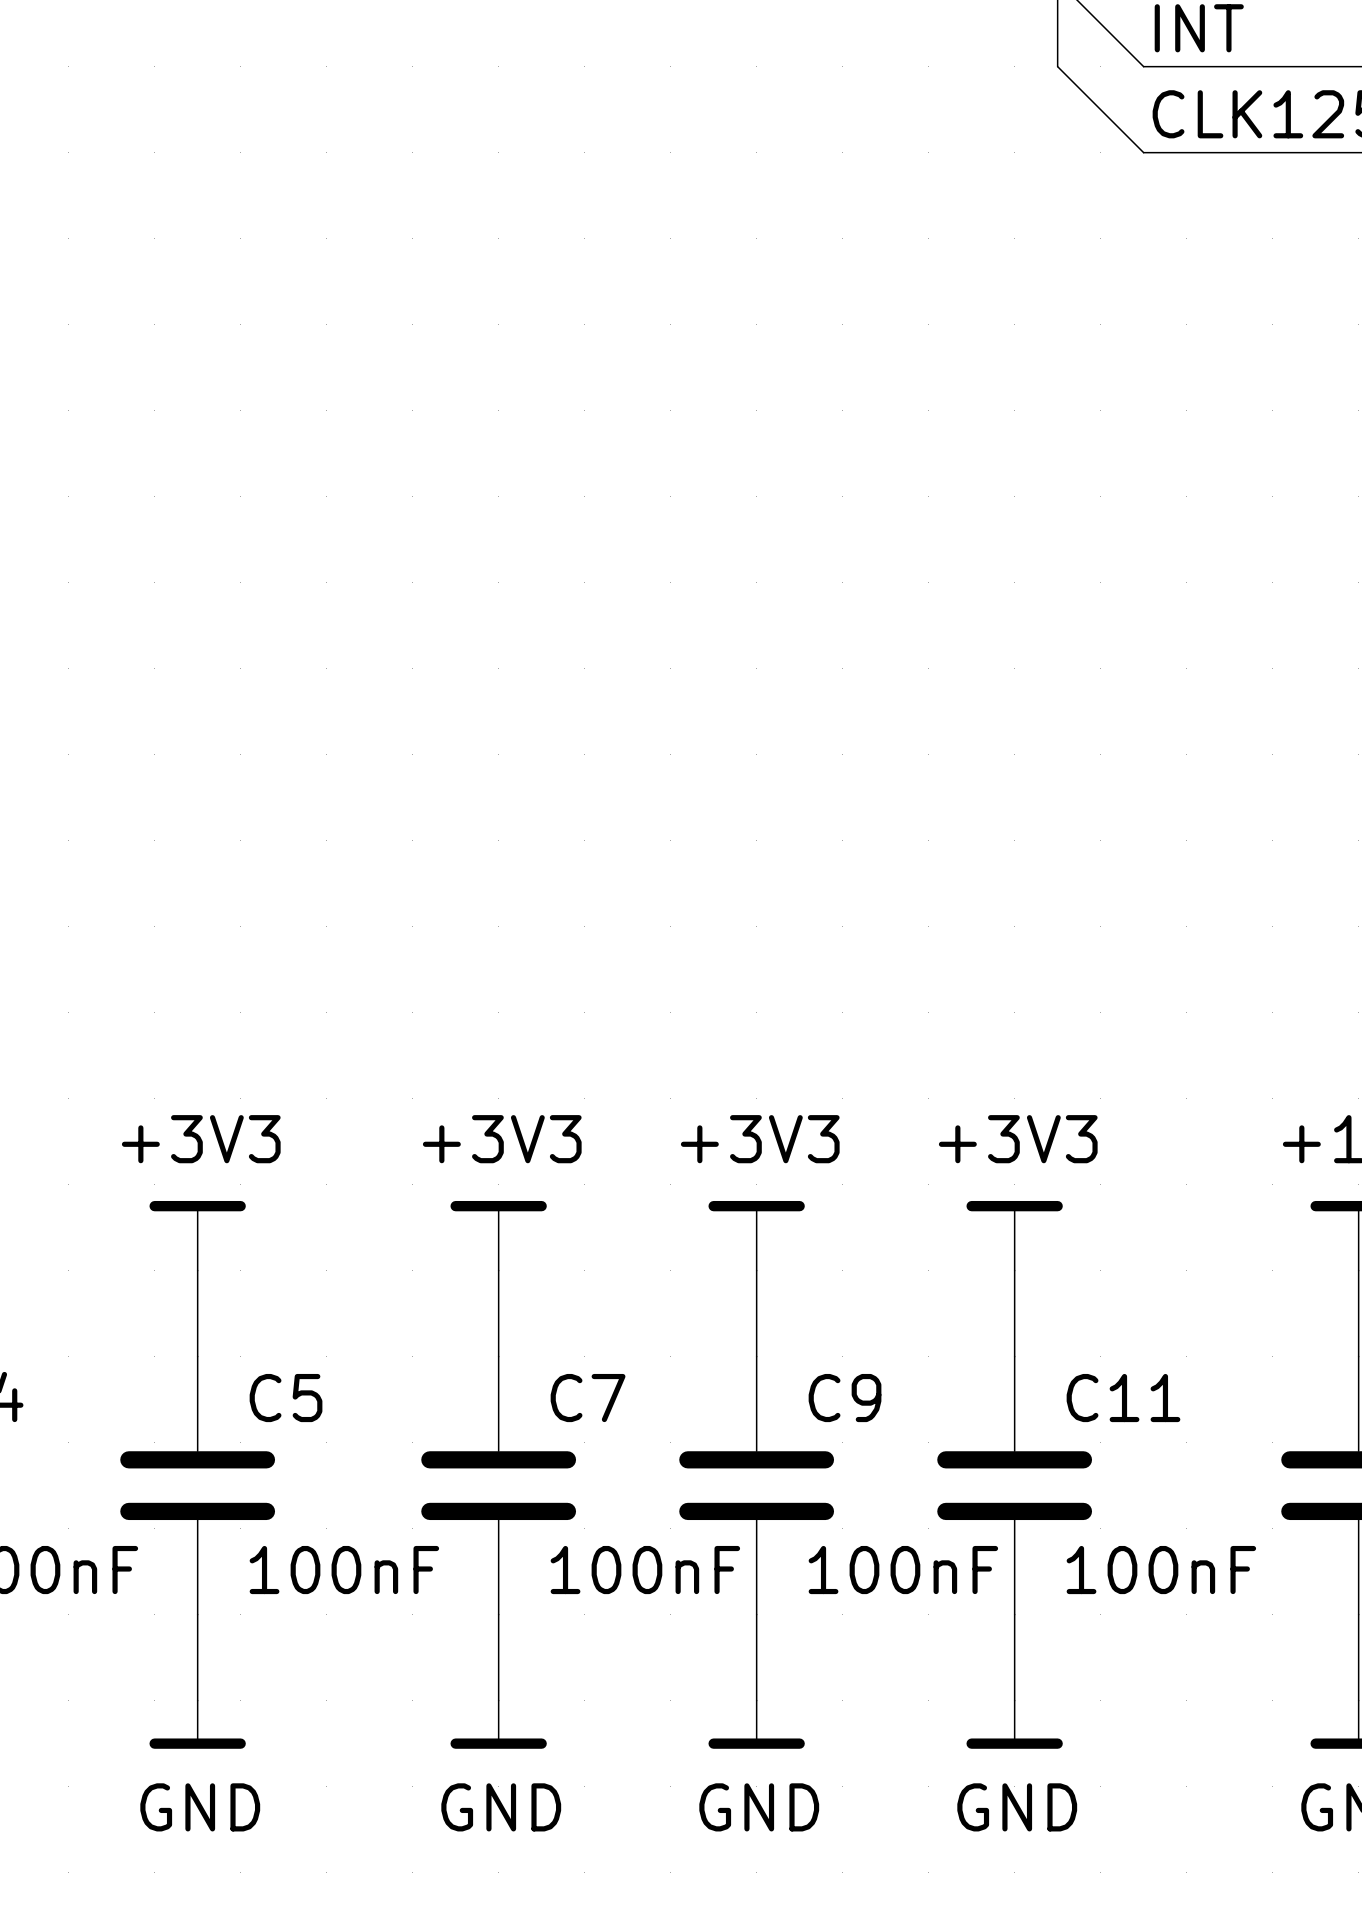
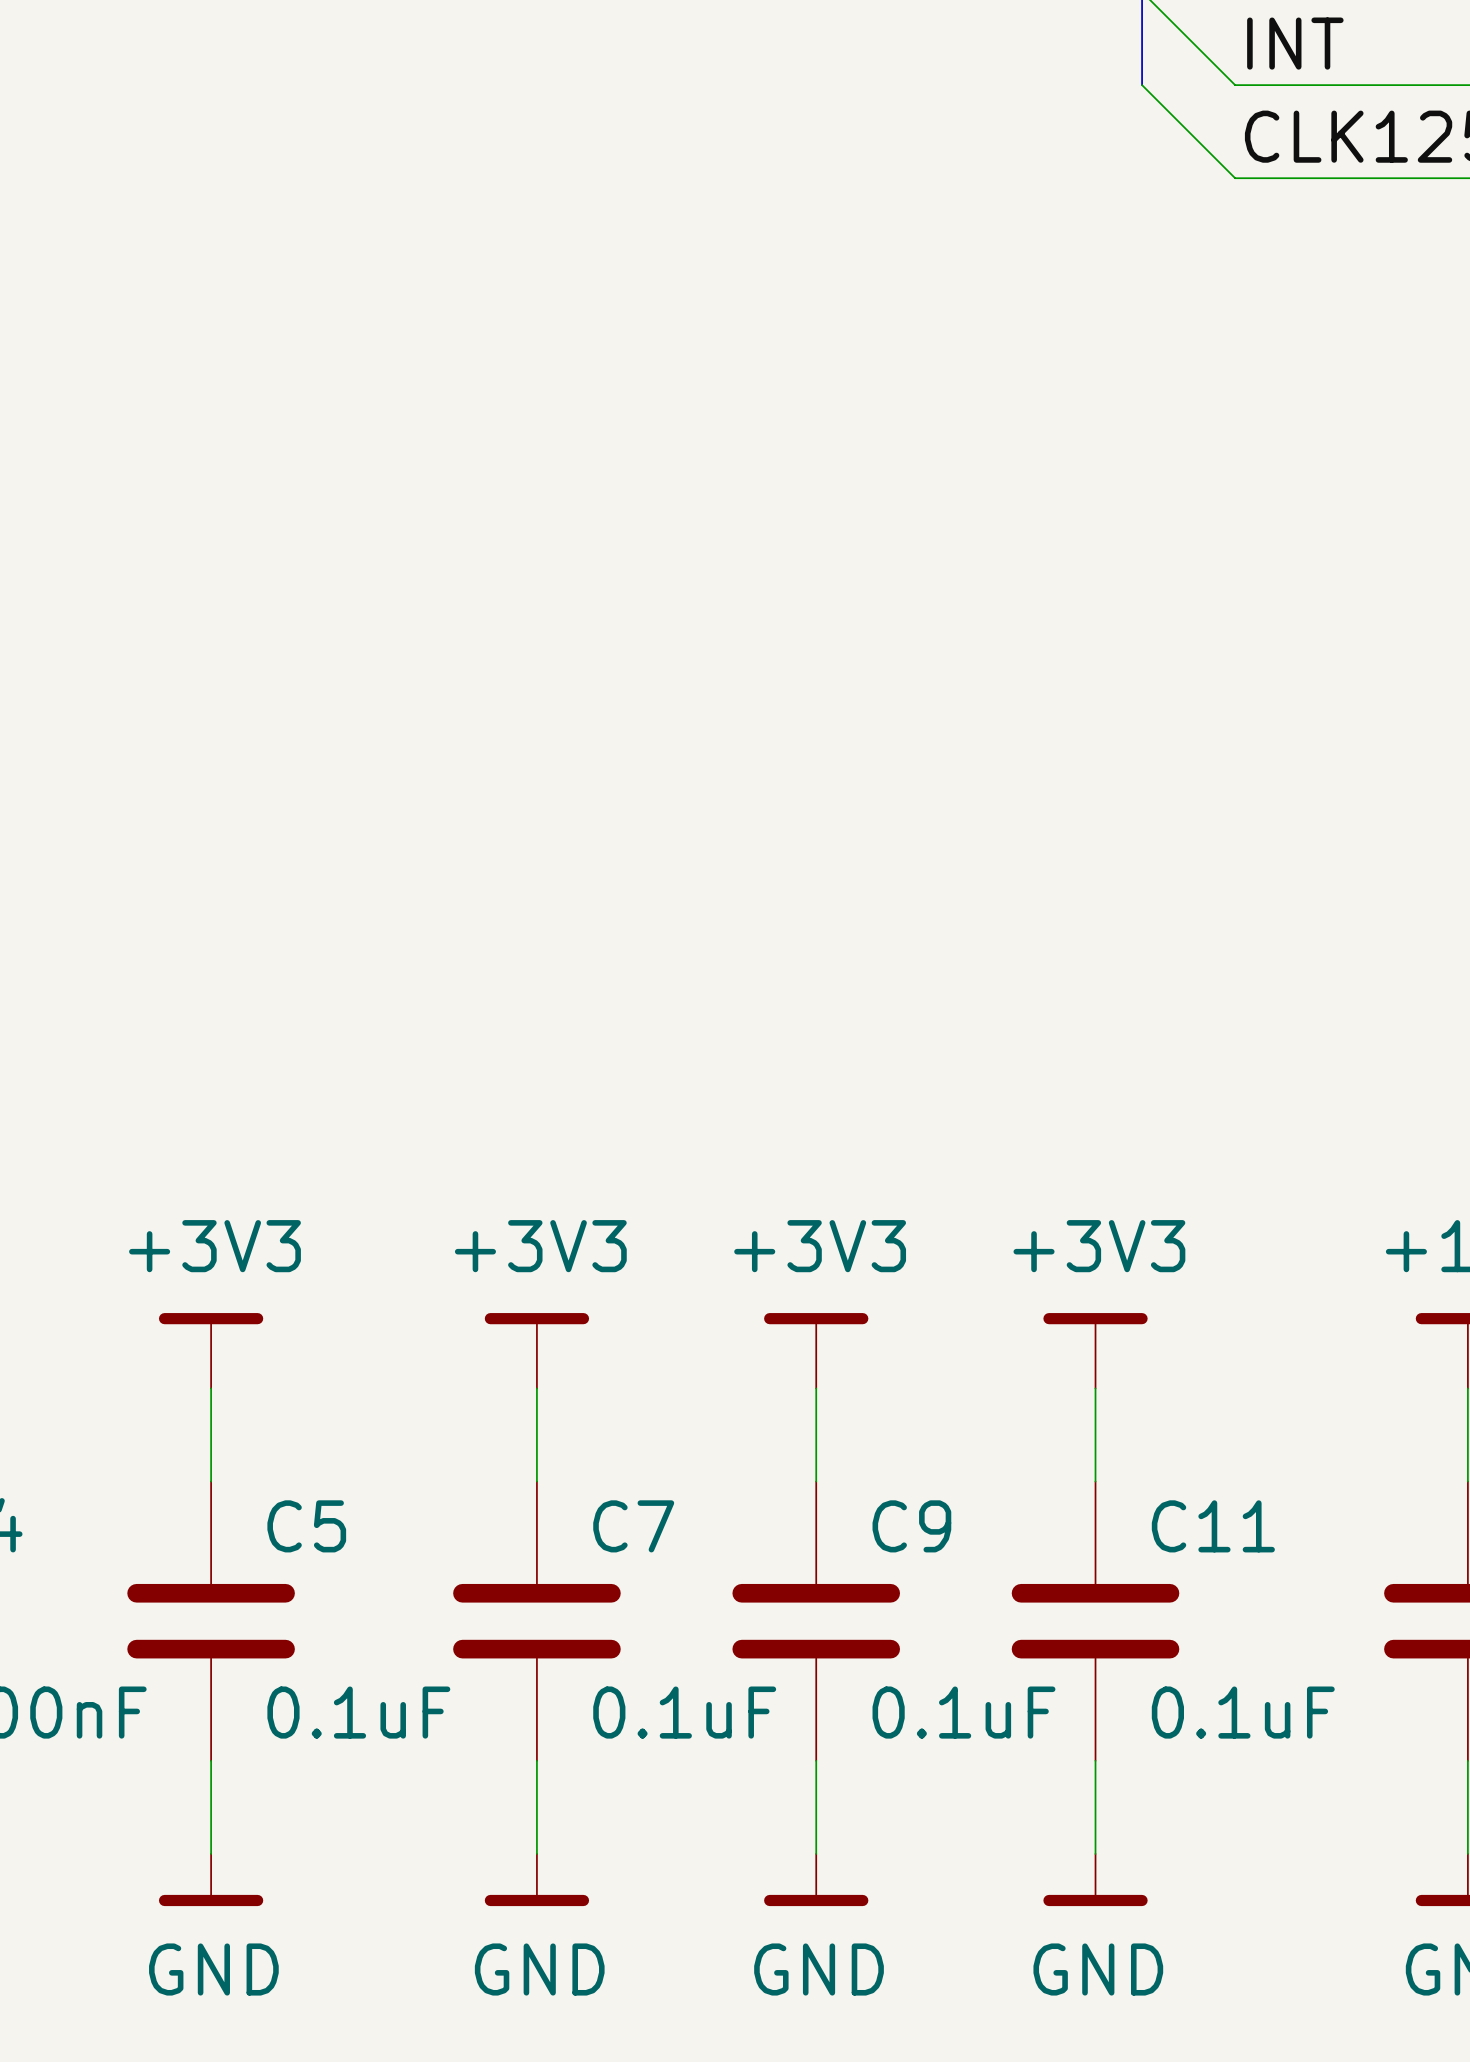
C5 value: 100nF (344, 1570) -> 0.1uF (358, 1712)
C7 value: 100nF (645, 1570) -> 0.1uF (684, 1712)
C9 value: 100nF (903, 1570) -> 0.1uF (963, 1712)
C11 value: 100nF (1161, 1570) -> 0.1uF (1243, 1712)

